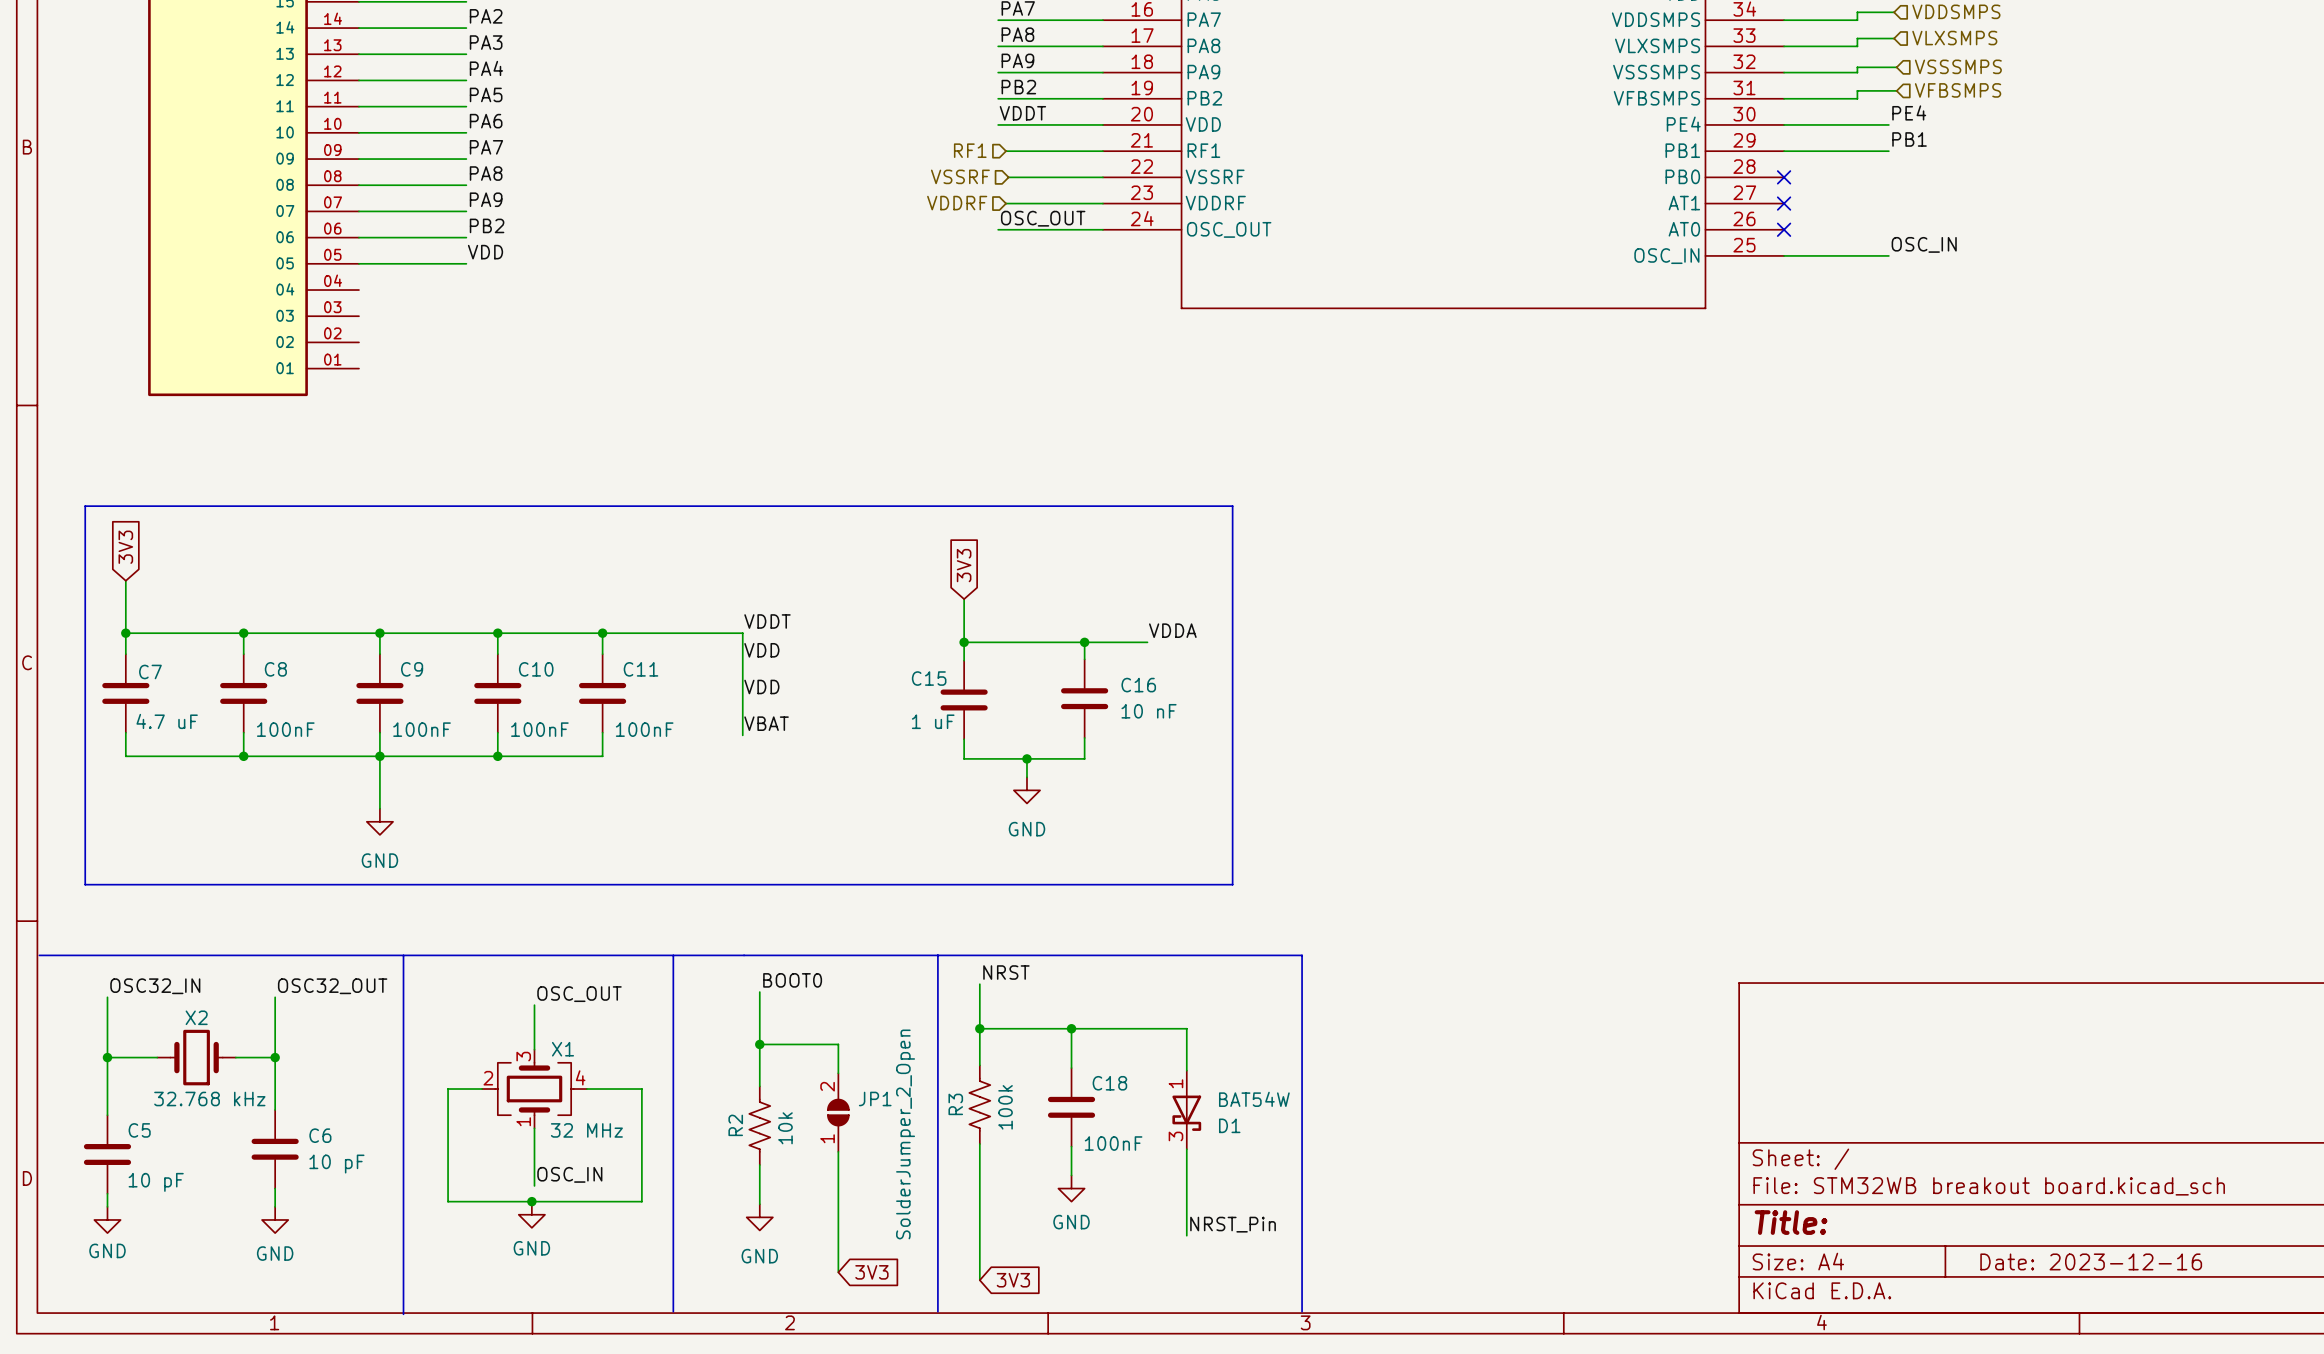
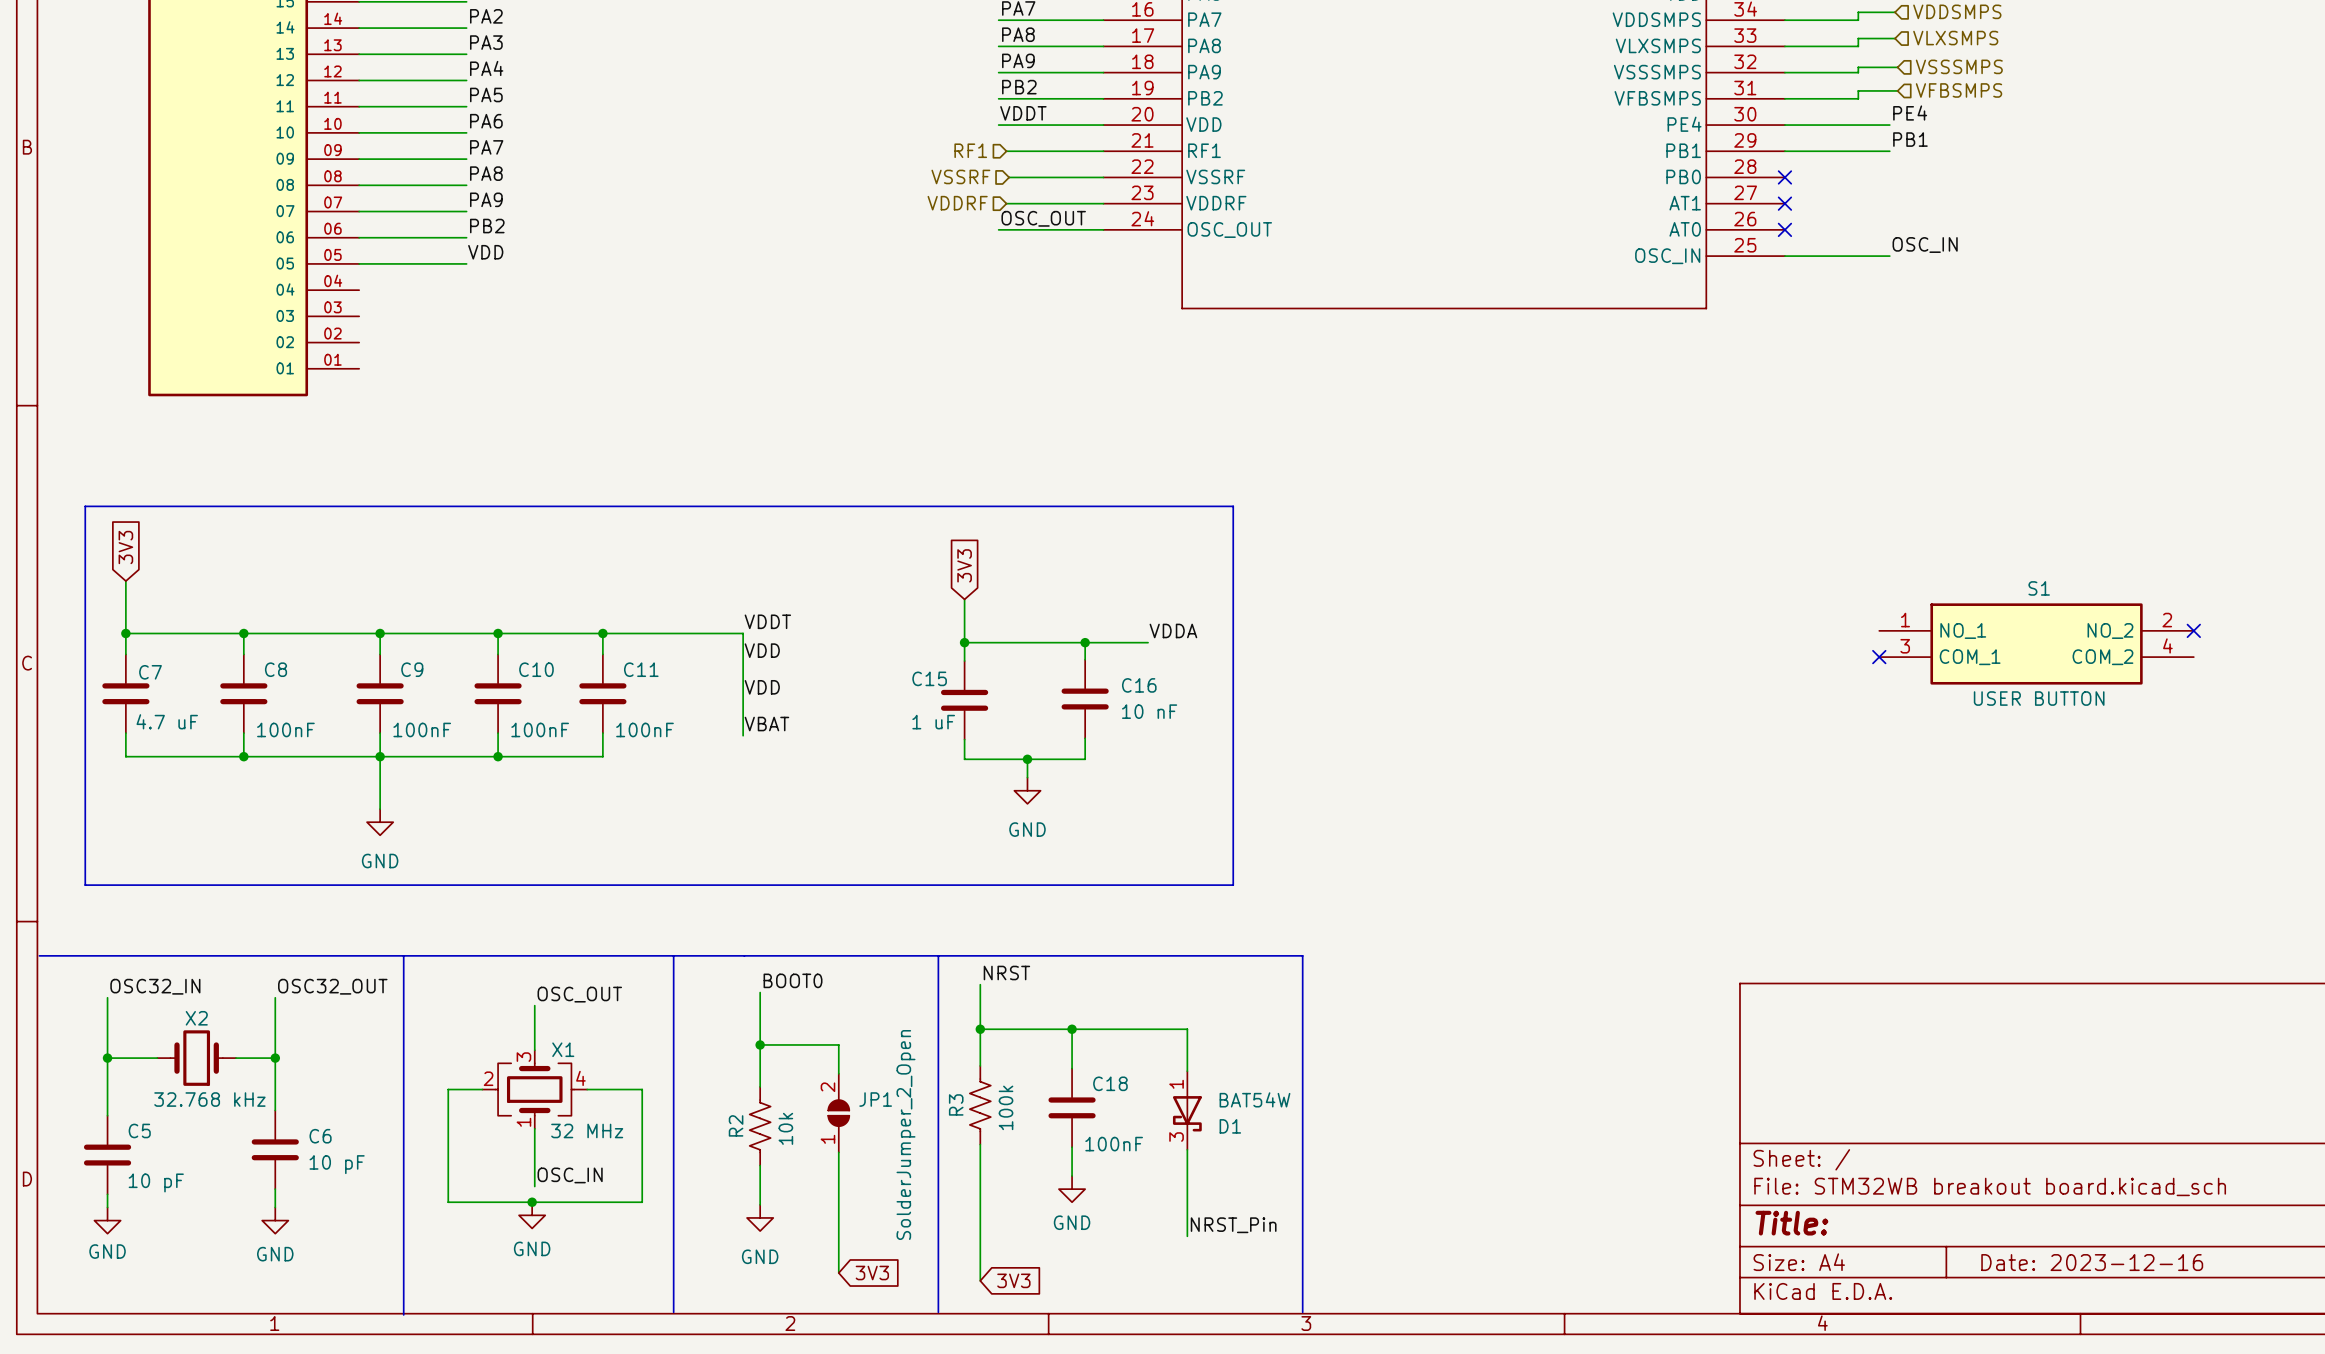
no-connect mark: none -> (2193, 630)
S1: none -> USER BUTTON (2036, 643)
no-connect mark: none -> (1879, 657)

